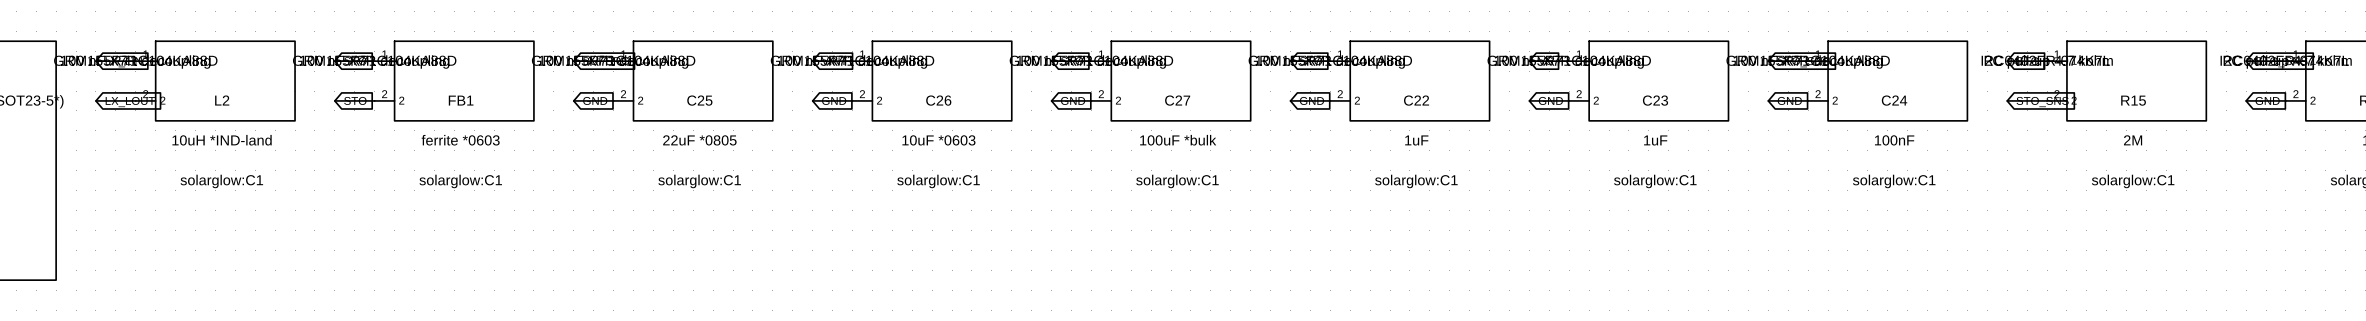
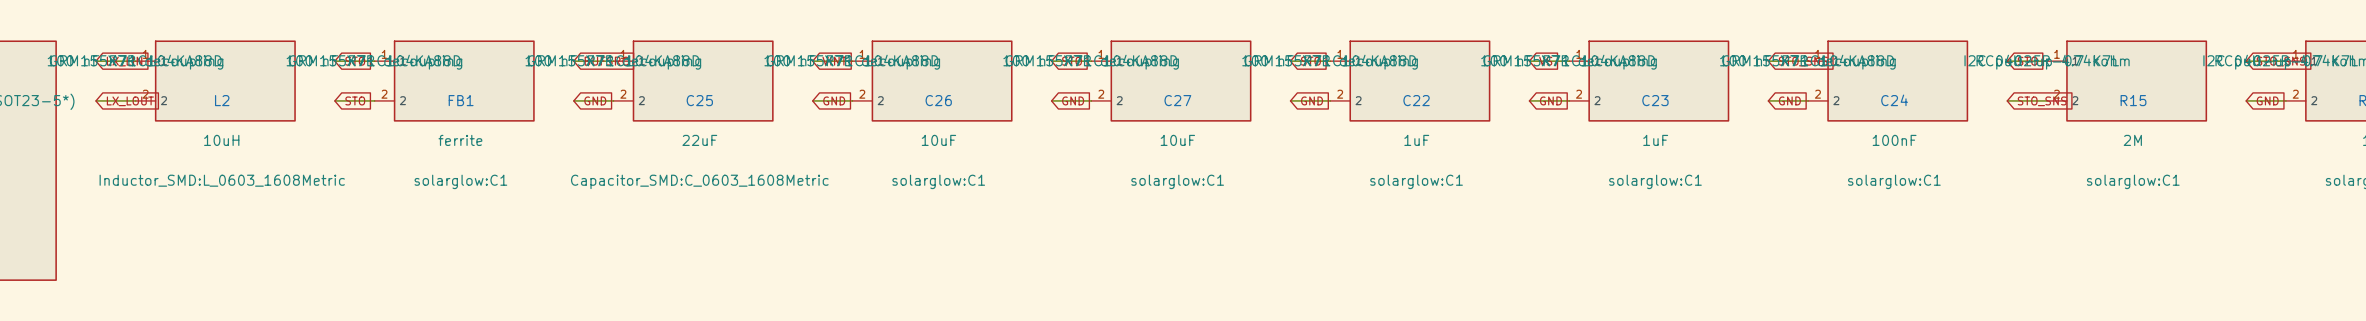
L2 value: 10uH *IND-land (222, 140) -> 10uH (221, 140)
FB1 value: ferrite *0603 (460, 140) -> ferrite (460, 140)
C25 value: 22uF *0805 (699, 140) -> 22uF (699, 140)
C26 value: 10uF *0603 (938, 140) -> 10uF (938, 140)
C27 value: 100uF *bulk (1178, 140) -> 10uF (1177, 140)
L2 text: solarglow:C1 (221, 181) -> Inductor_SMD:L_0603_1608Metric (222, 180)
C25 text: solarglow:C1 (699, 181) -> Capacitor_SMD:C_0603_1608Metric (699, 181)

